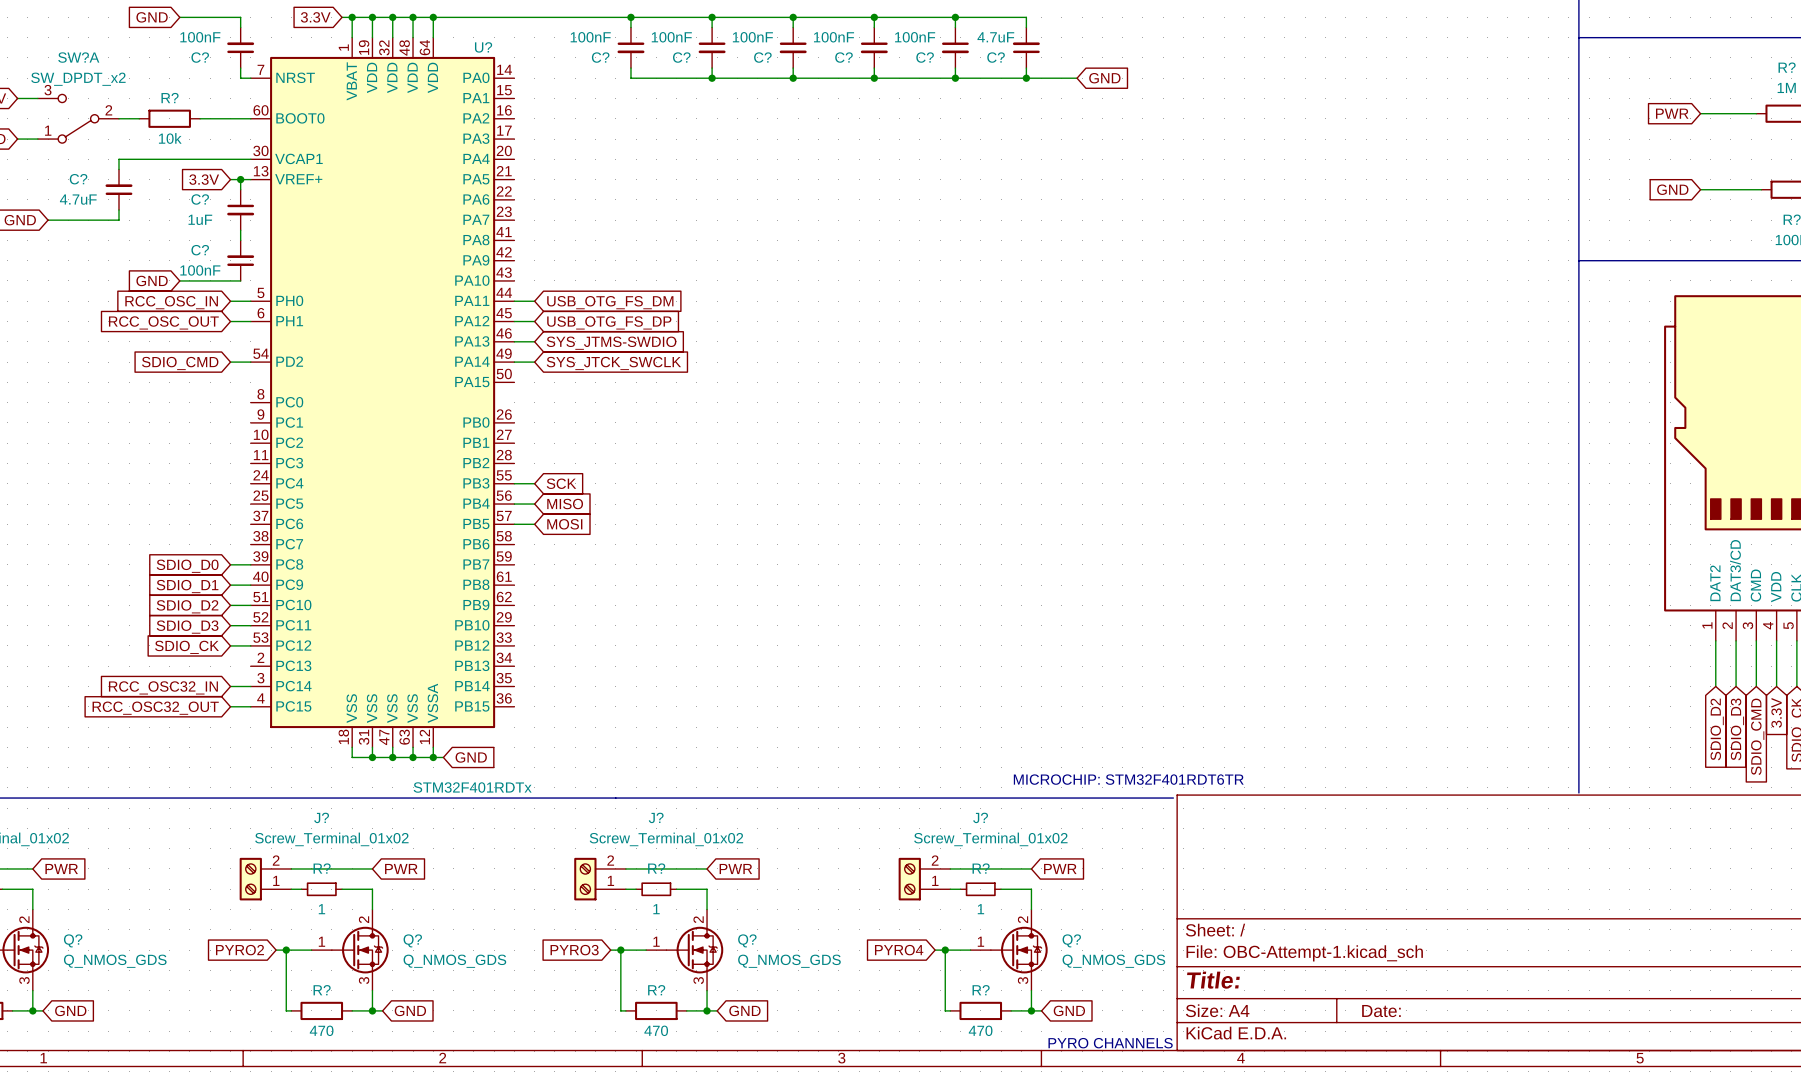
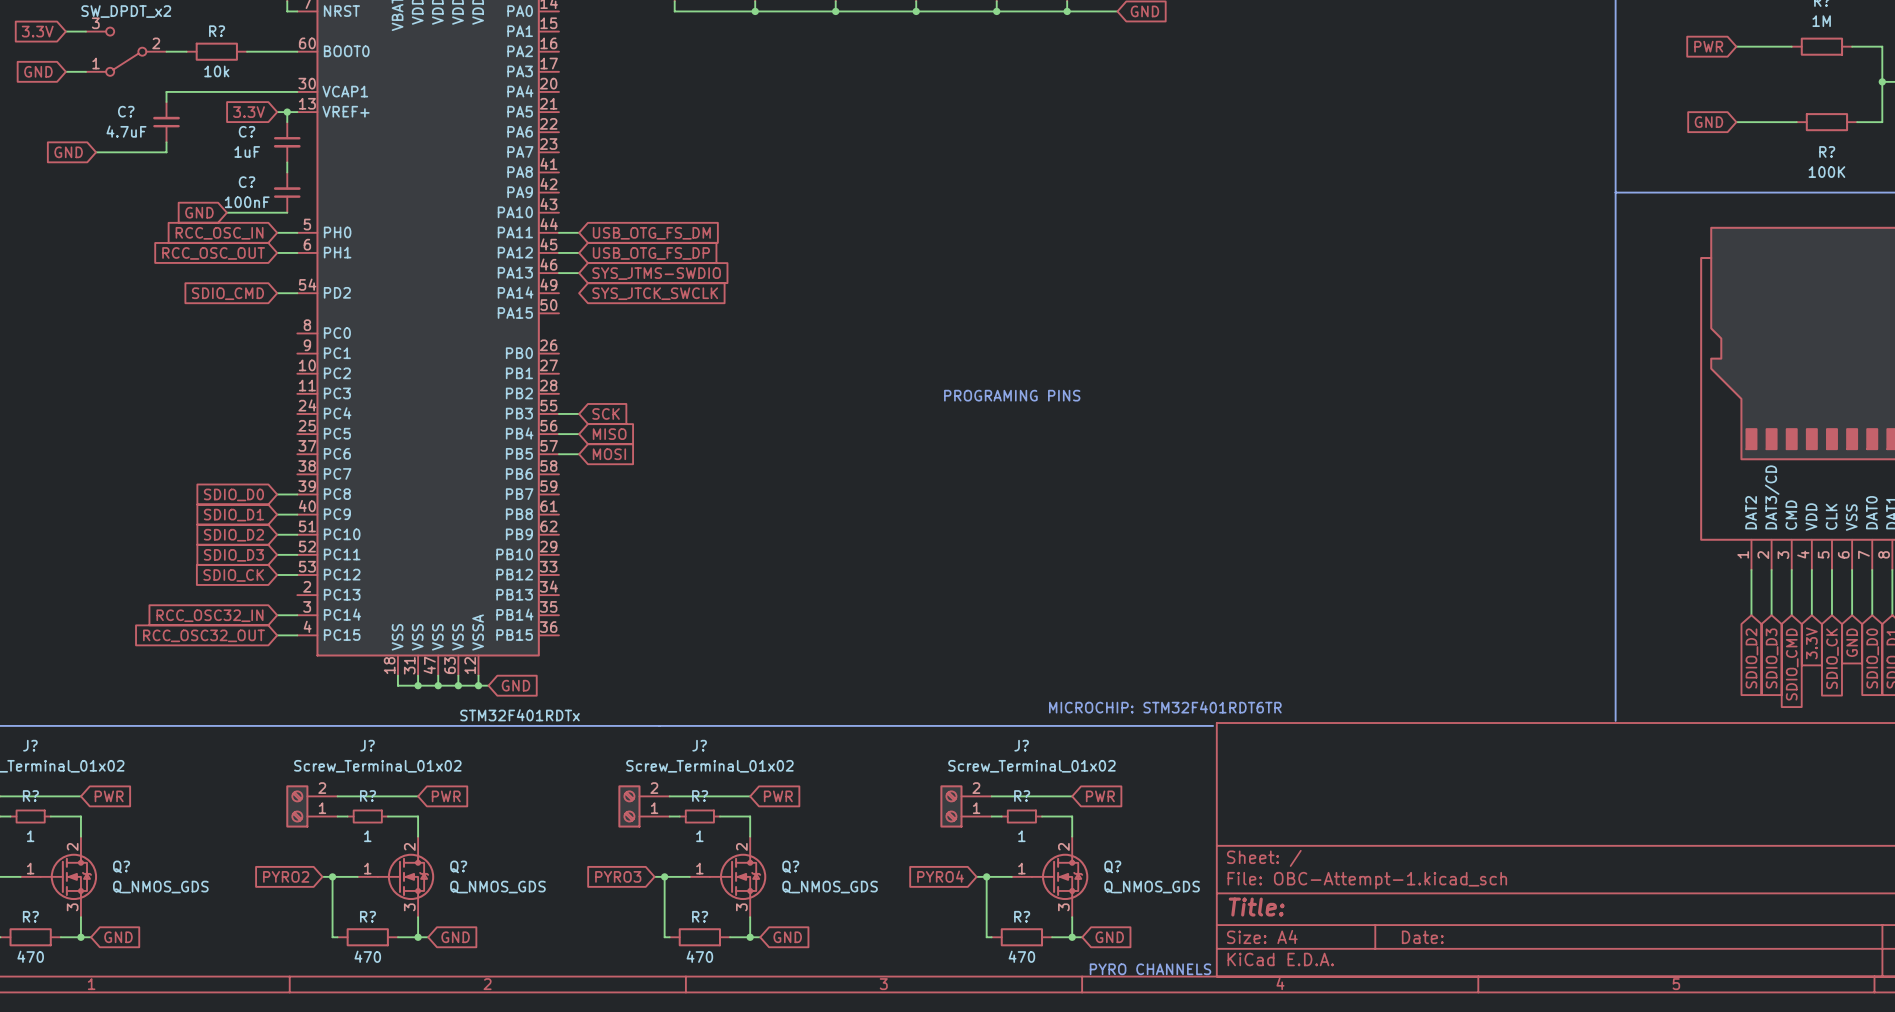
wire: (514, 362) (534, 362) -> none
text: none -> PROGRAMING PINS (1012, 395)

